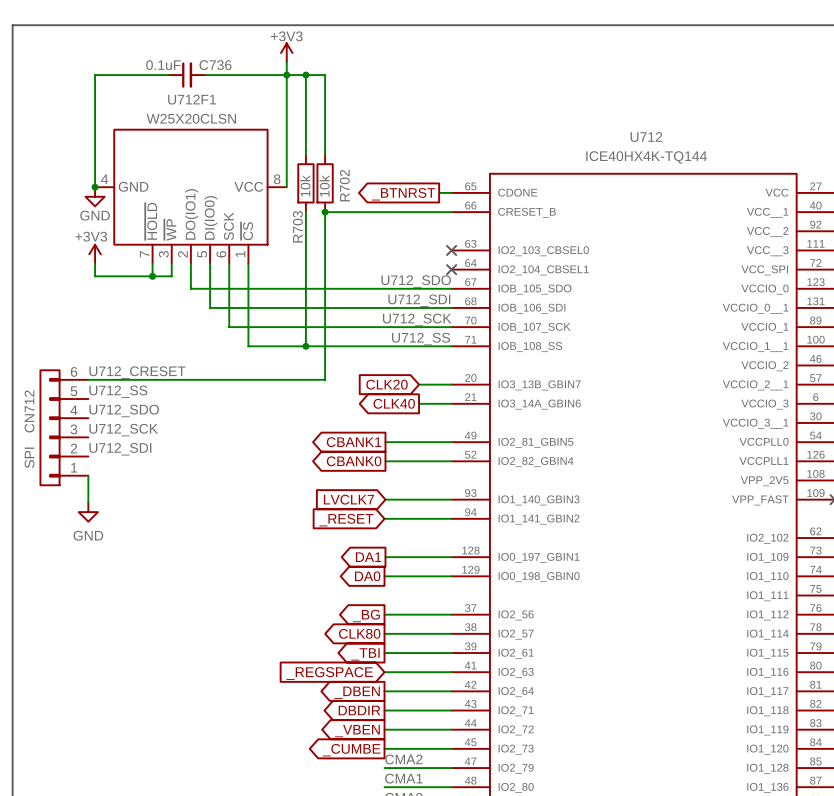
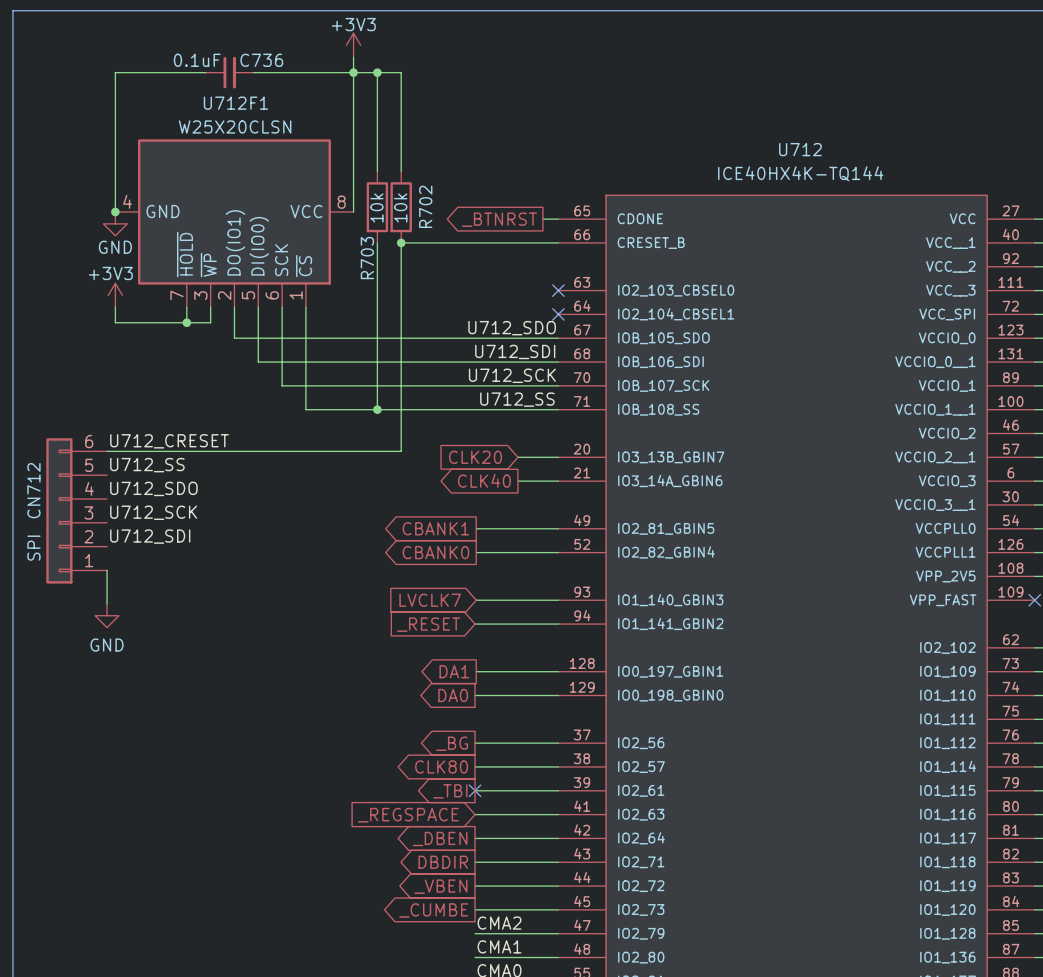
no-connect mark: none -> (475, 790)

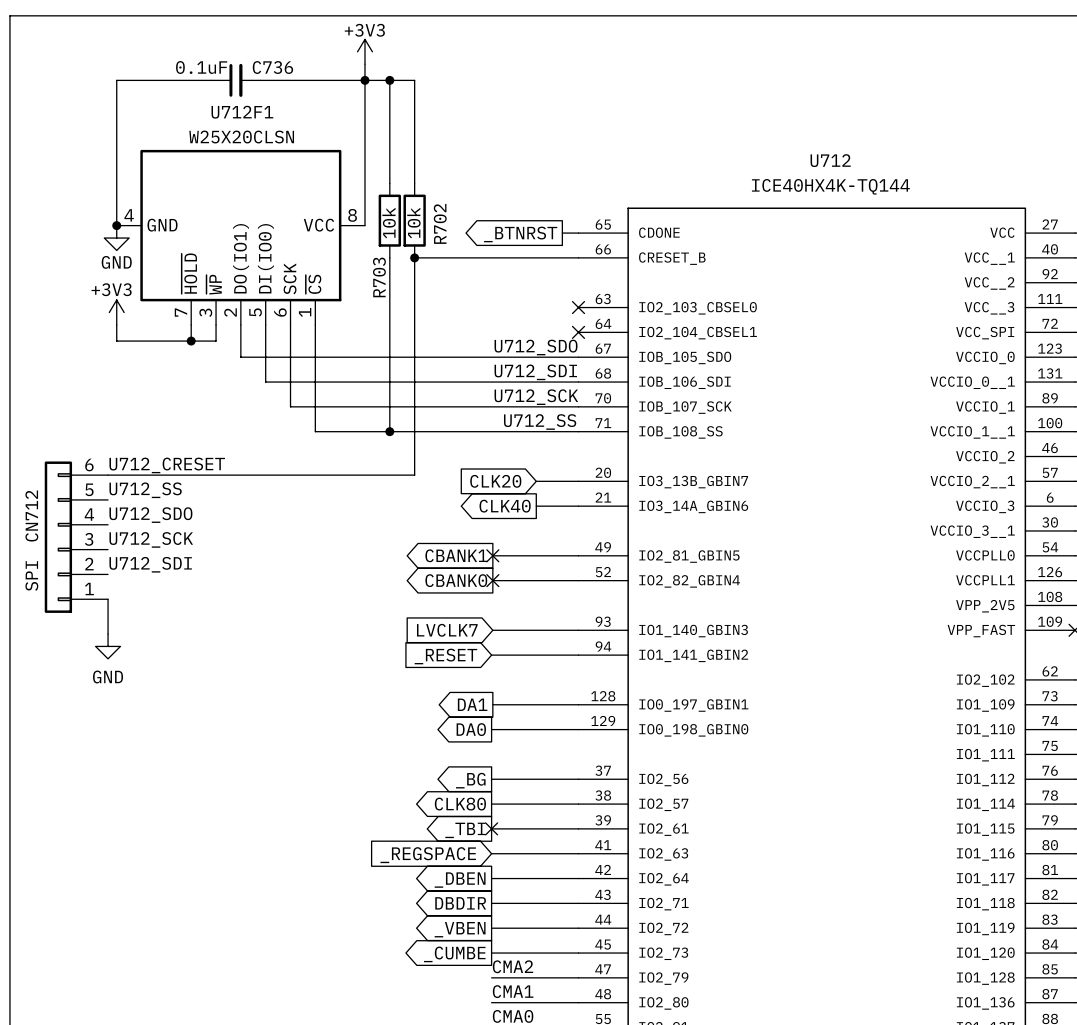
no-connect mark: none -> (492, 555)
no-connect mark: none -> (492, 580)

